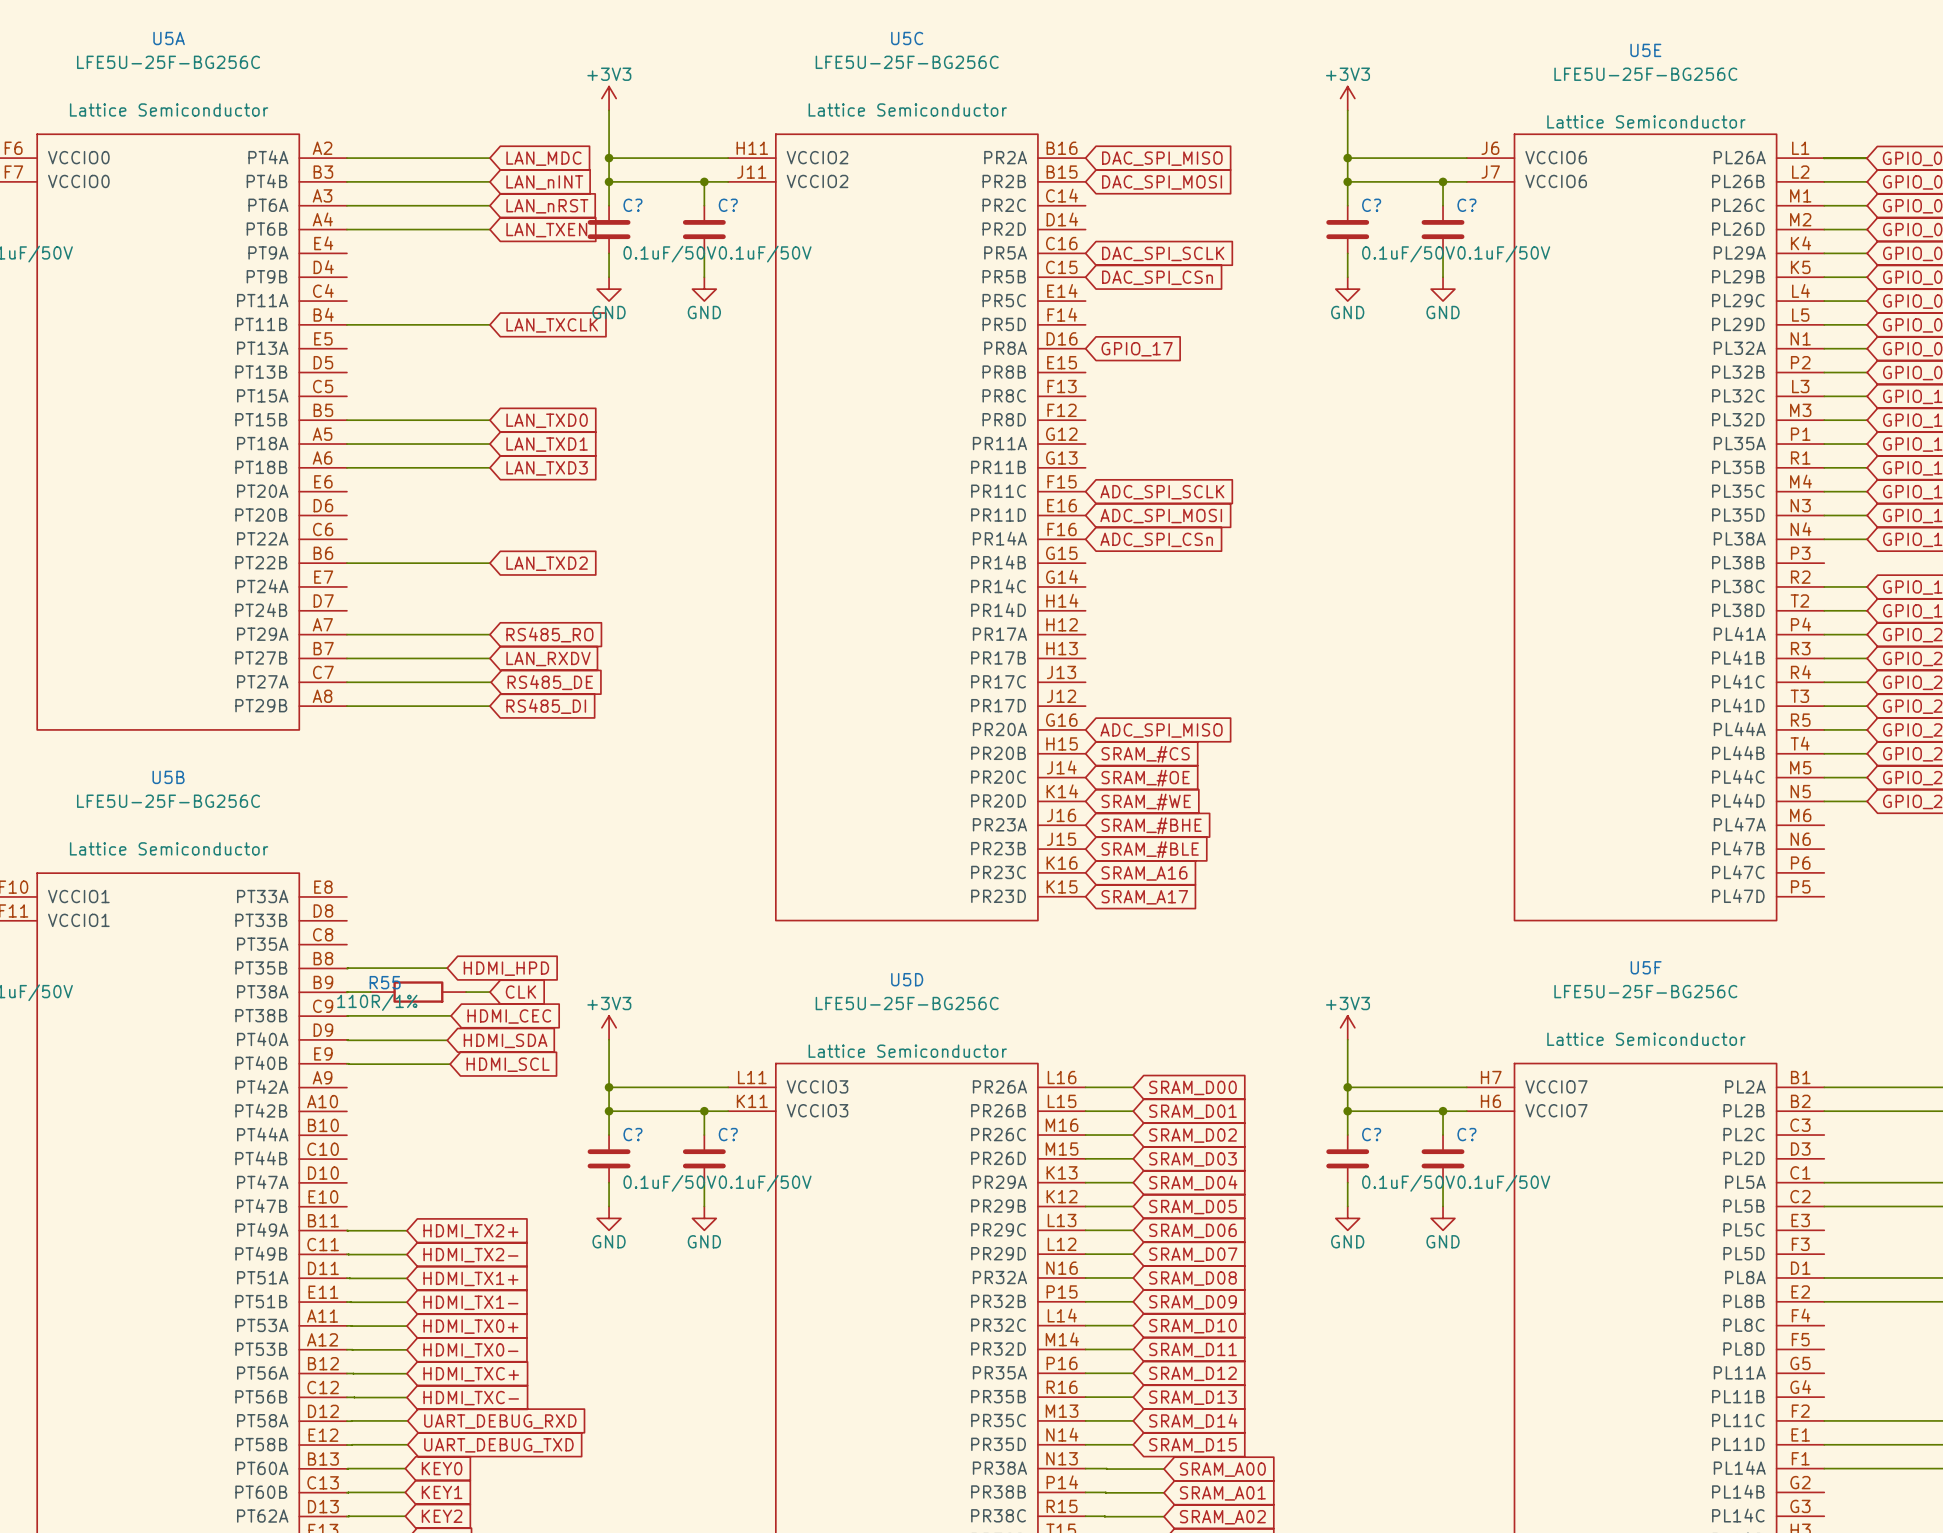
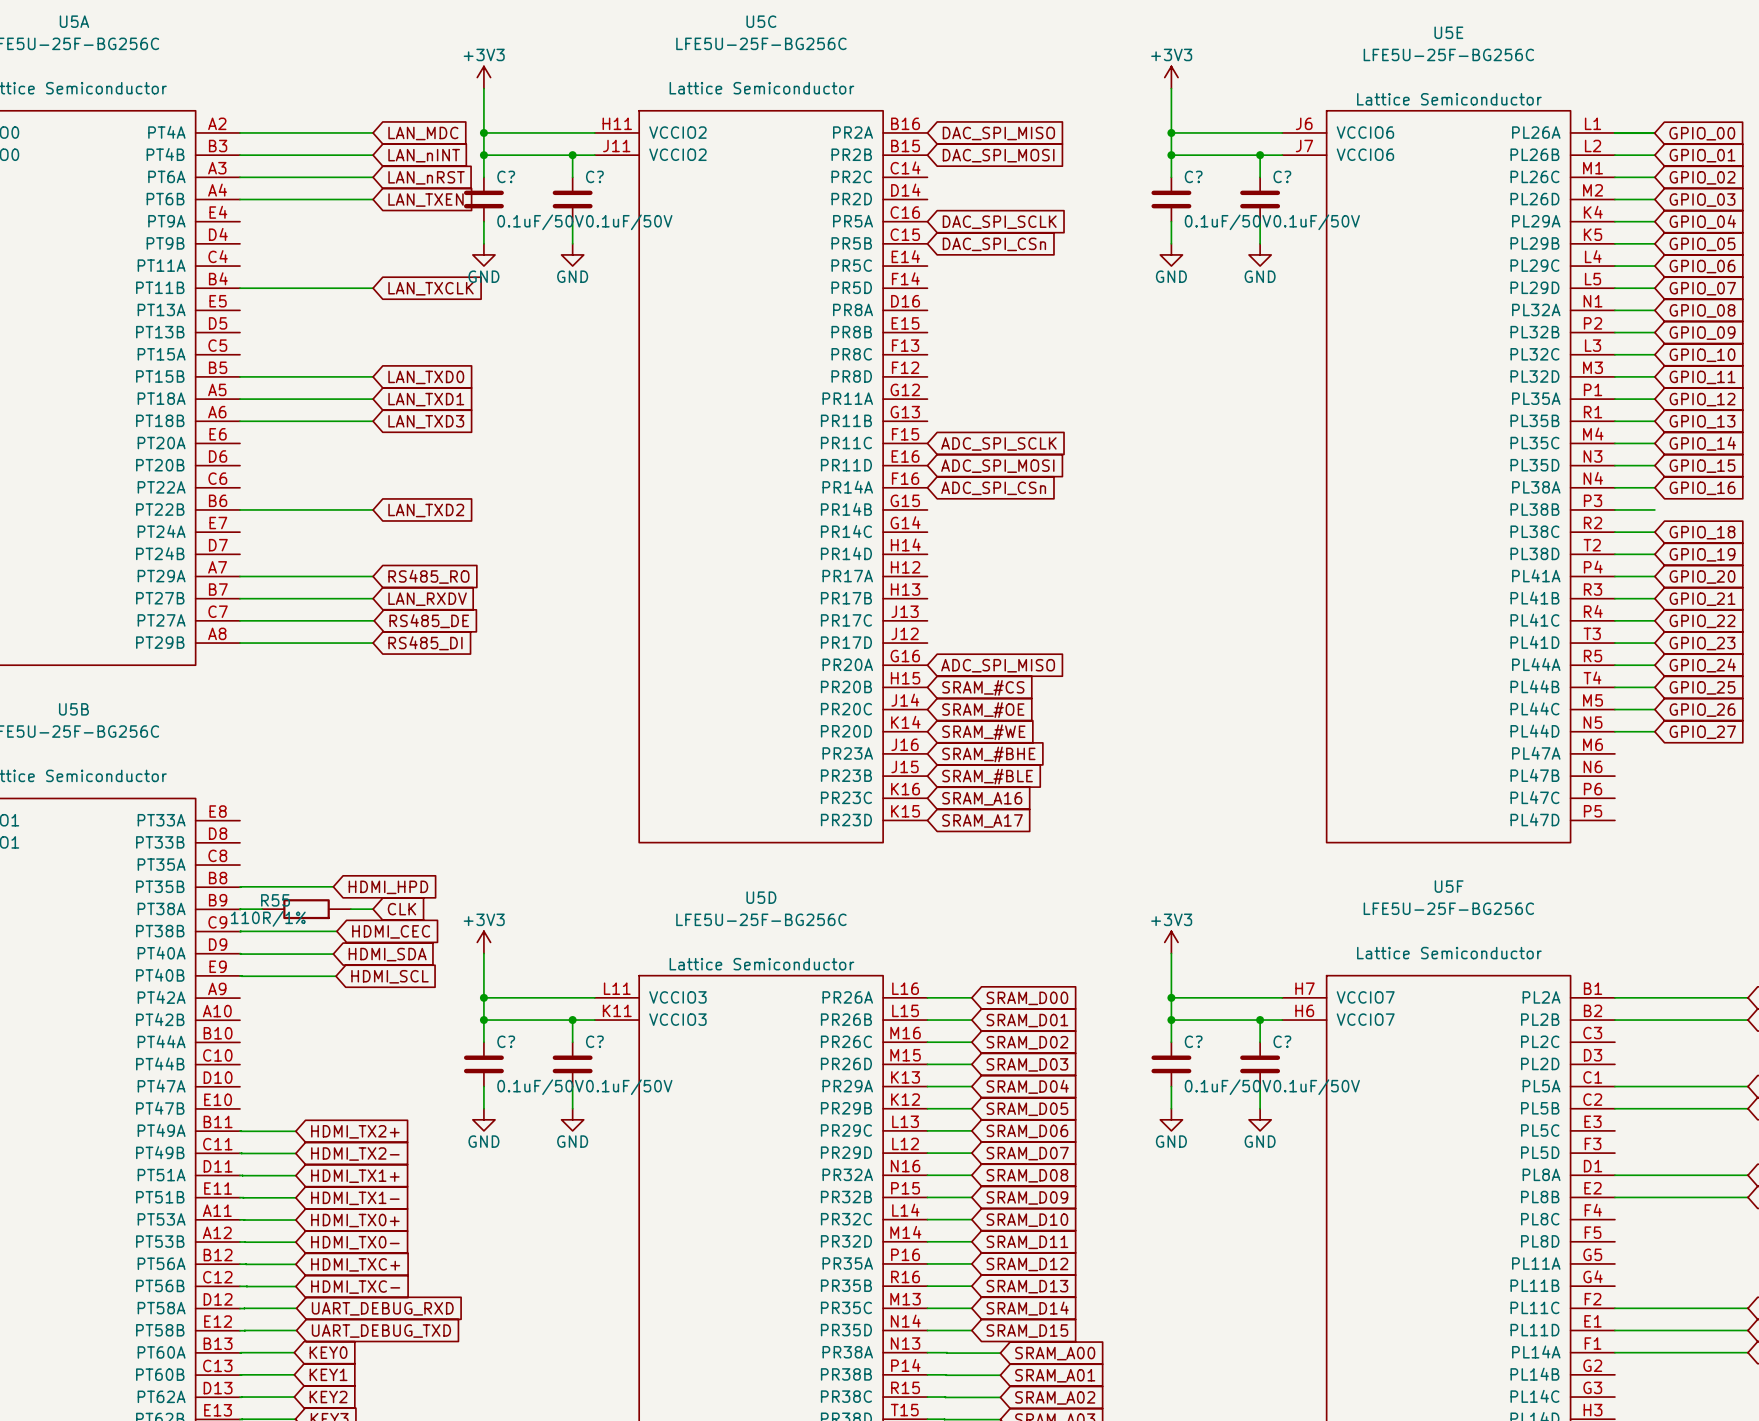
global label: GPIO_17 (1137, 349) -> none
wire: none -> (1614, 509) (1654, 509)

